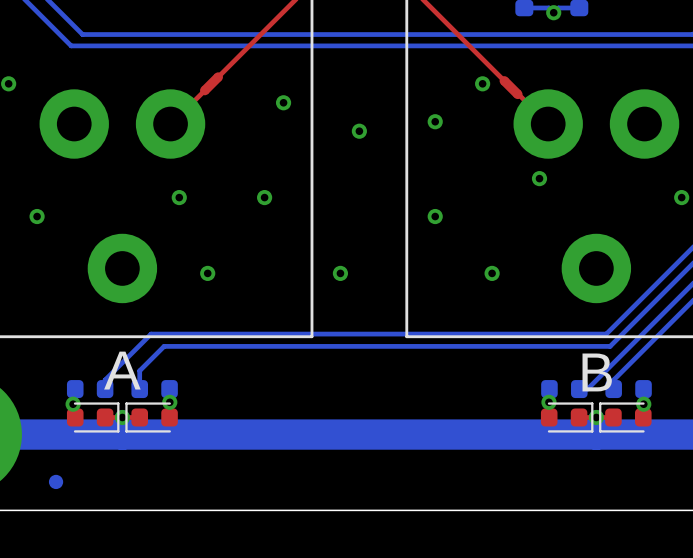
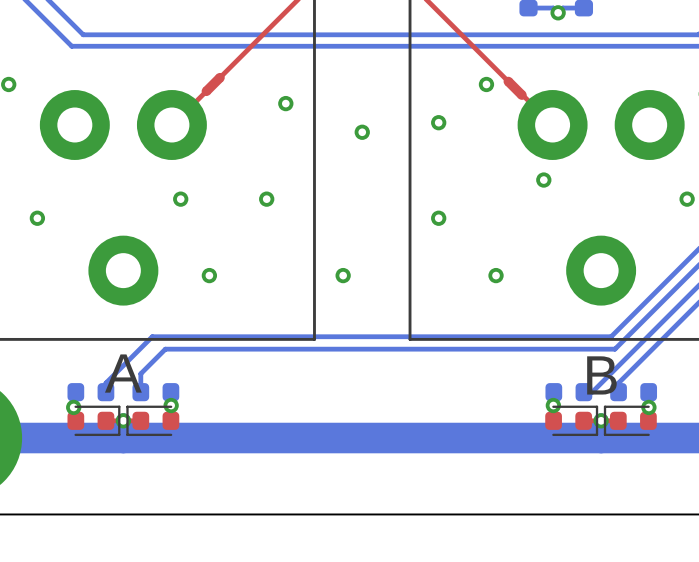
part: (56, 481) -> none

